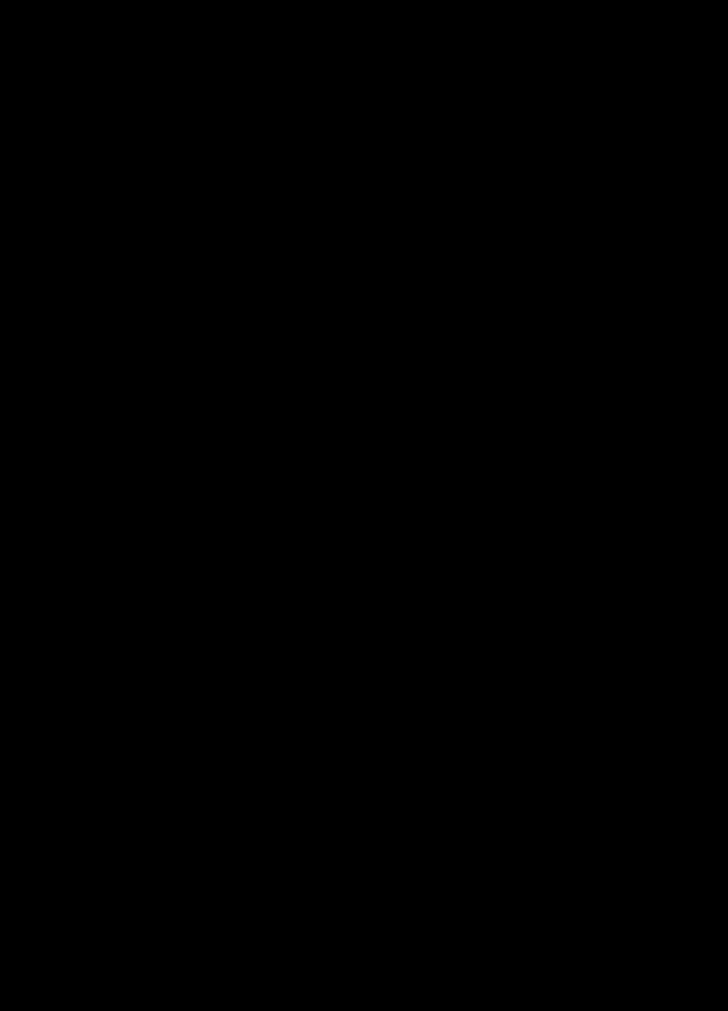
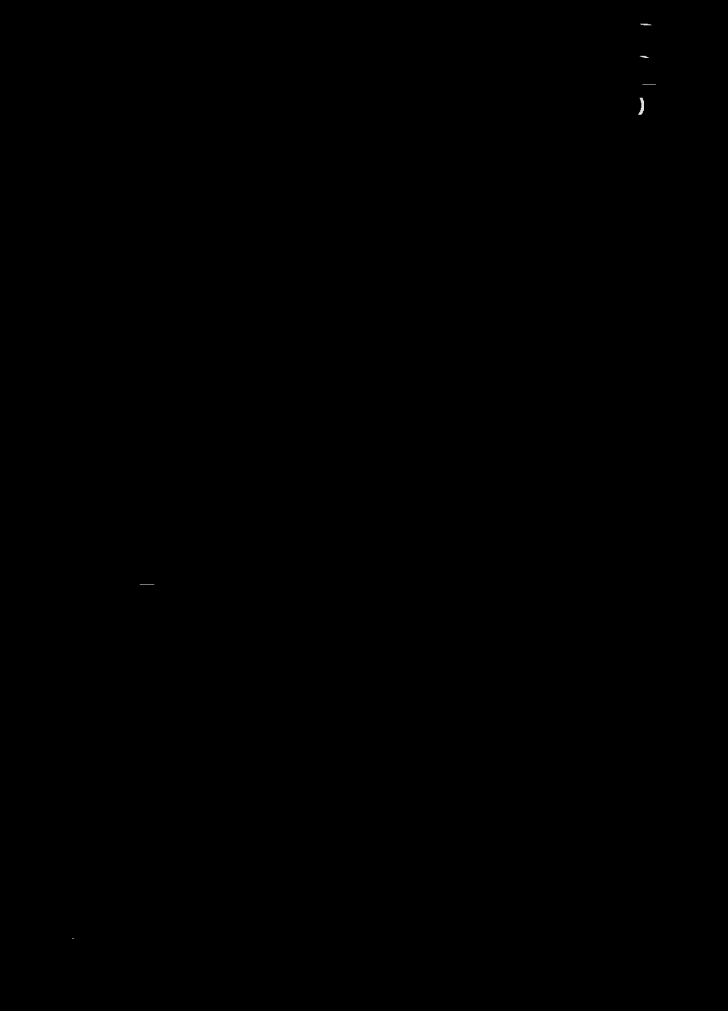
drawing: none -> [638, 23, 656, 115]
drawing: none -> [139, 584, 155, 585]

